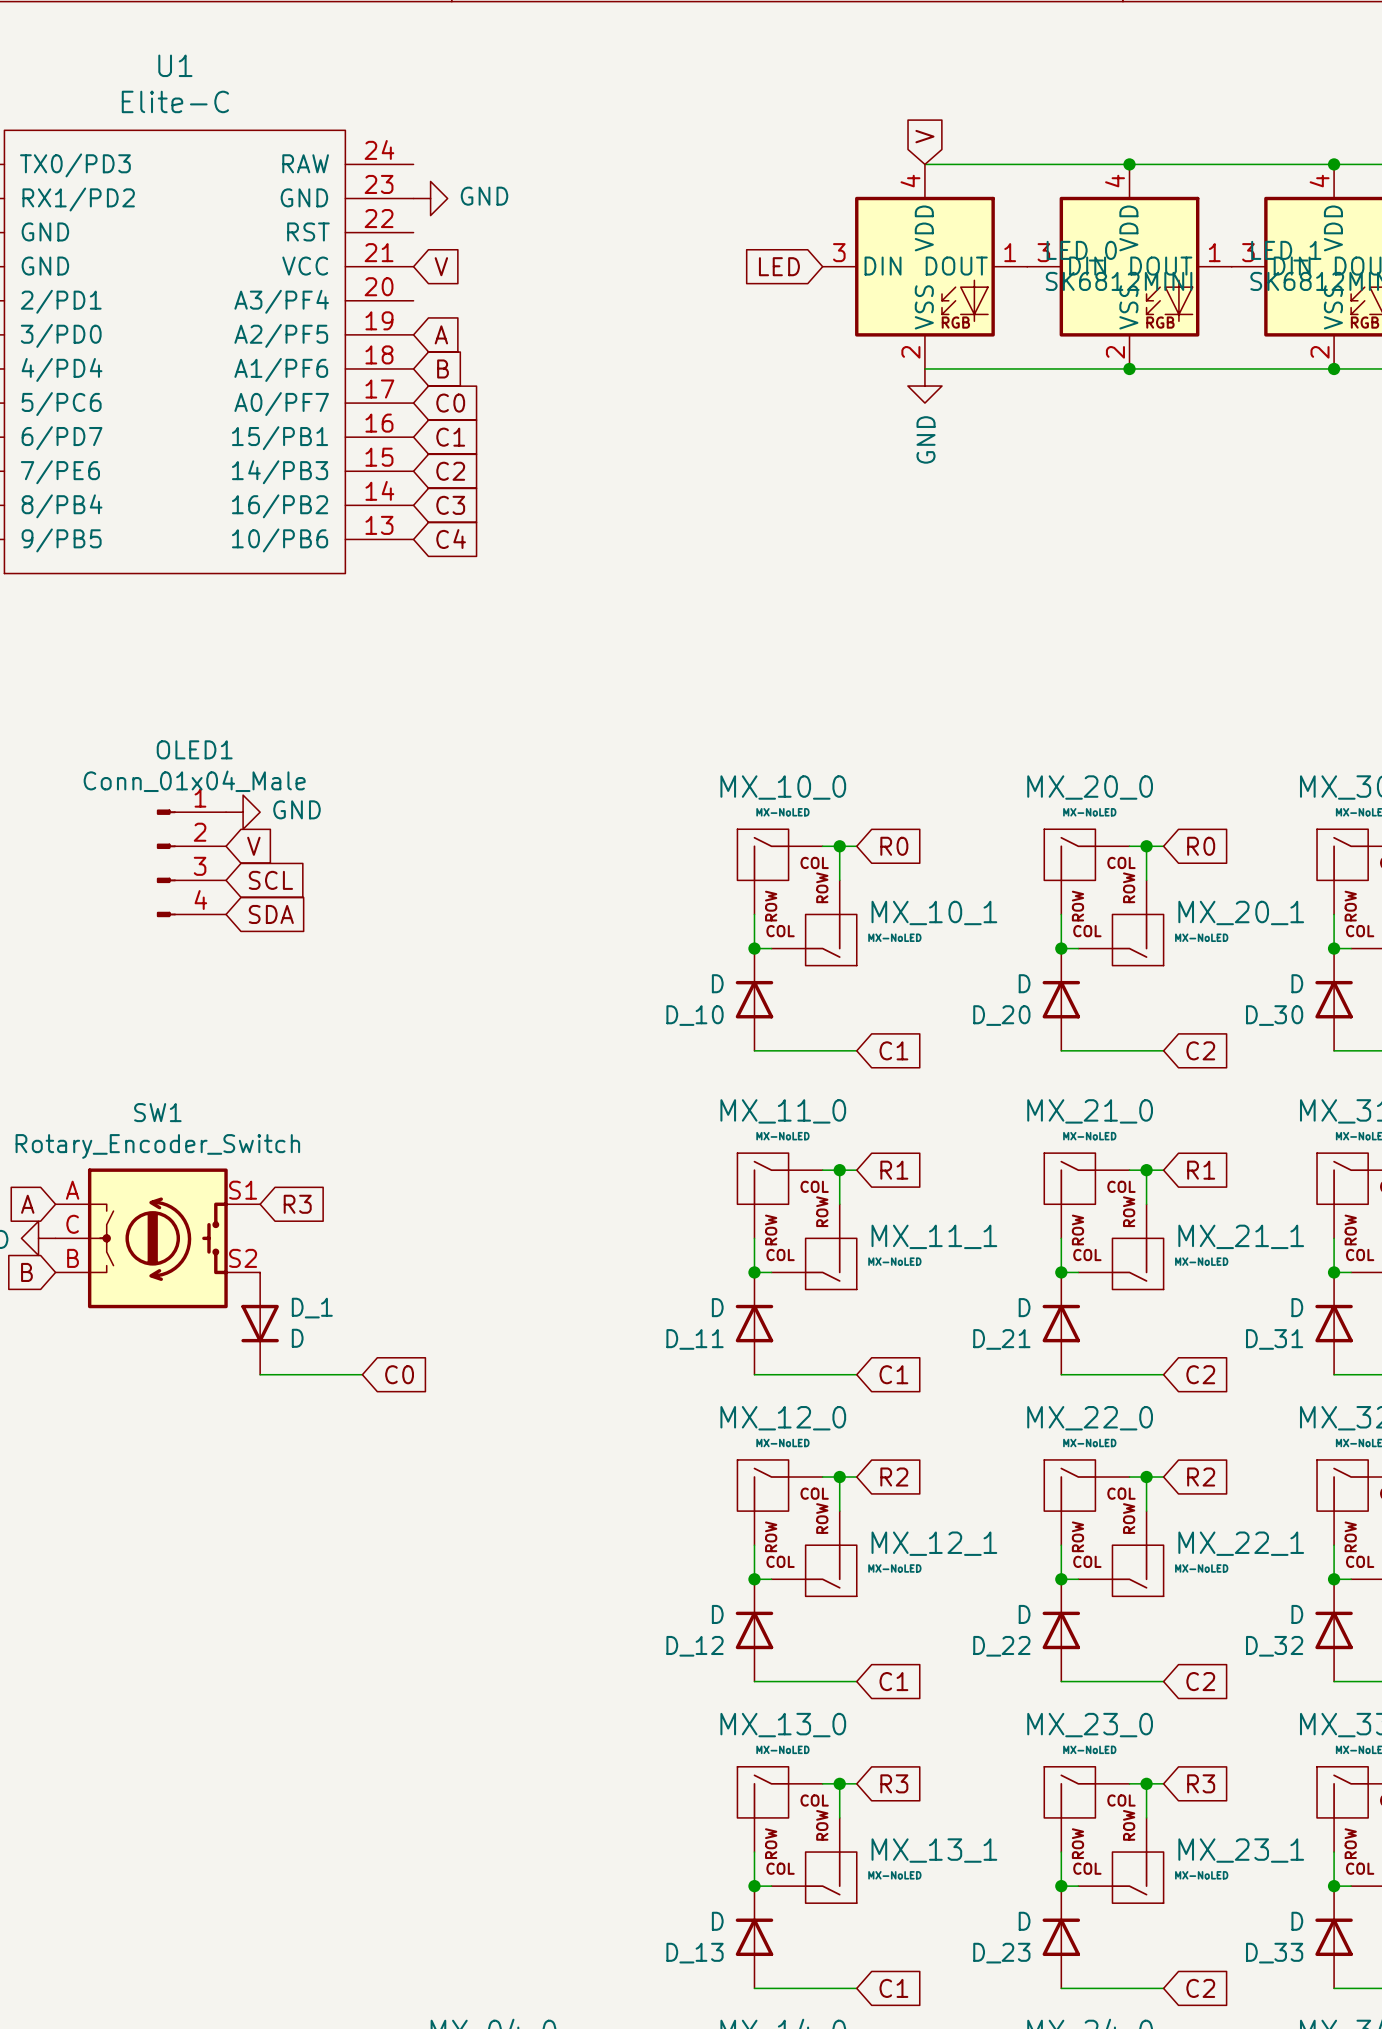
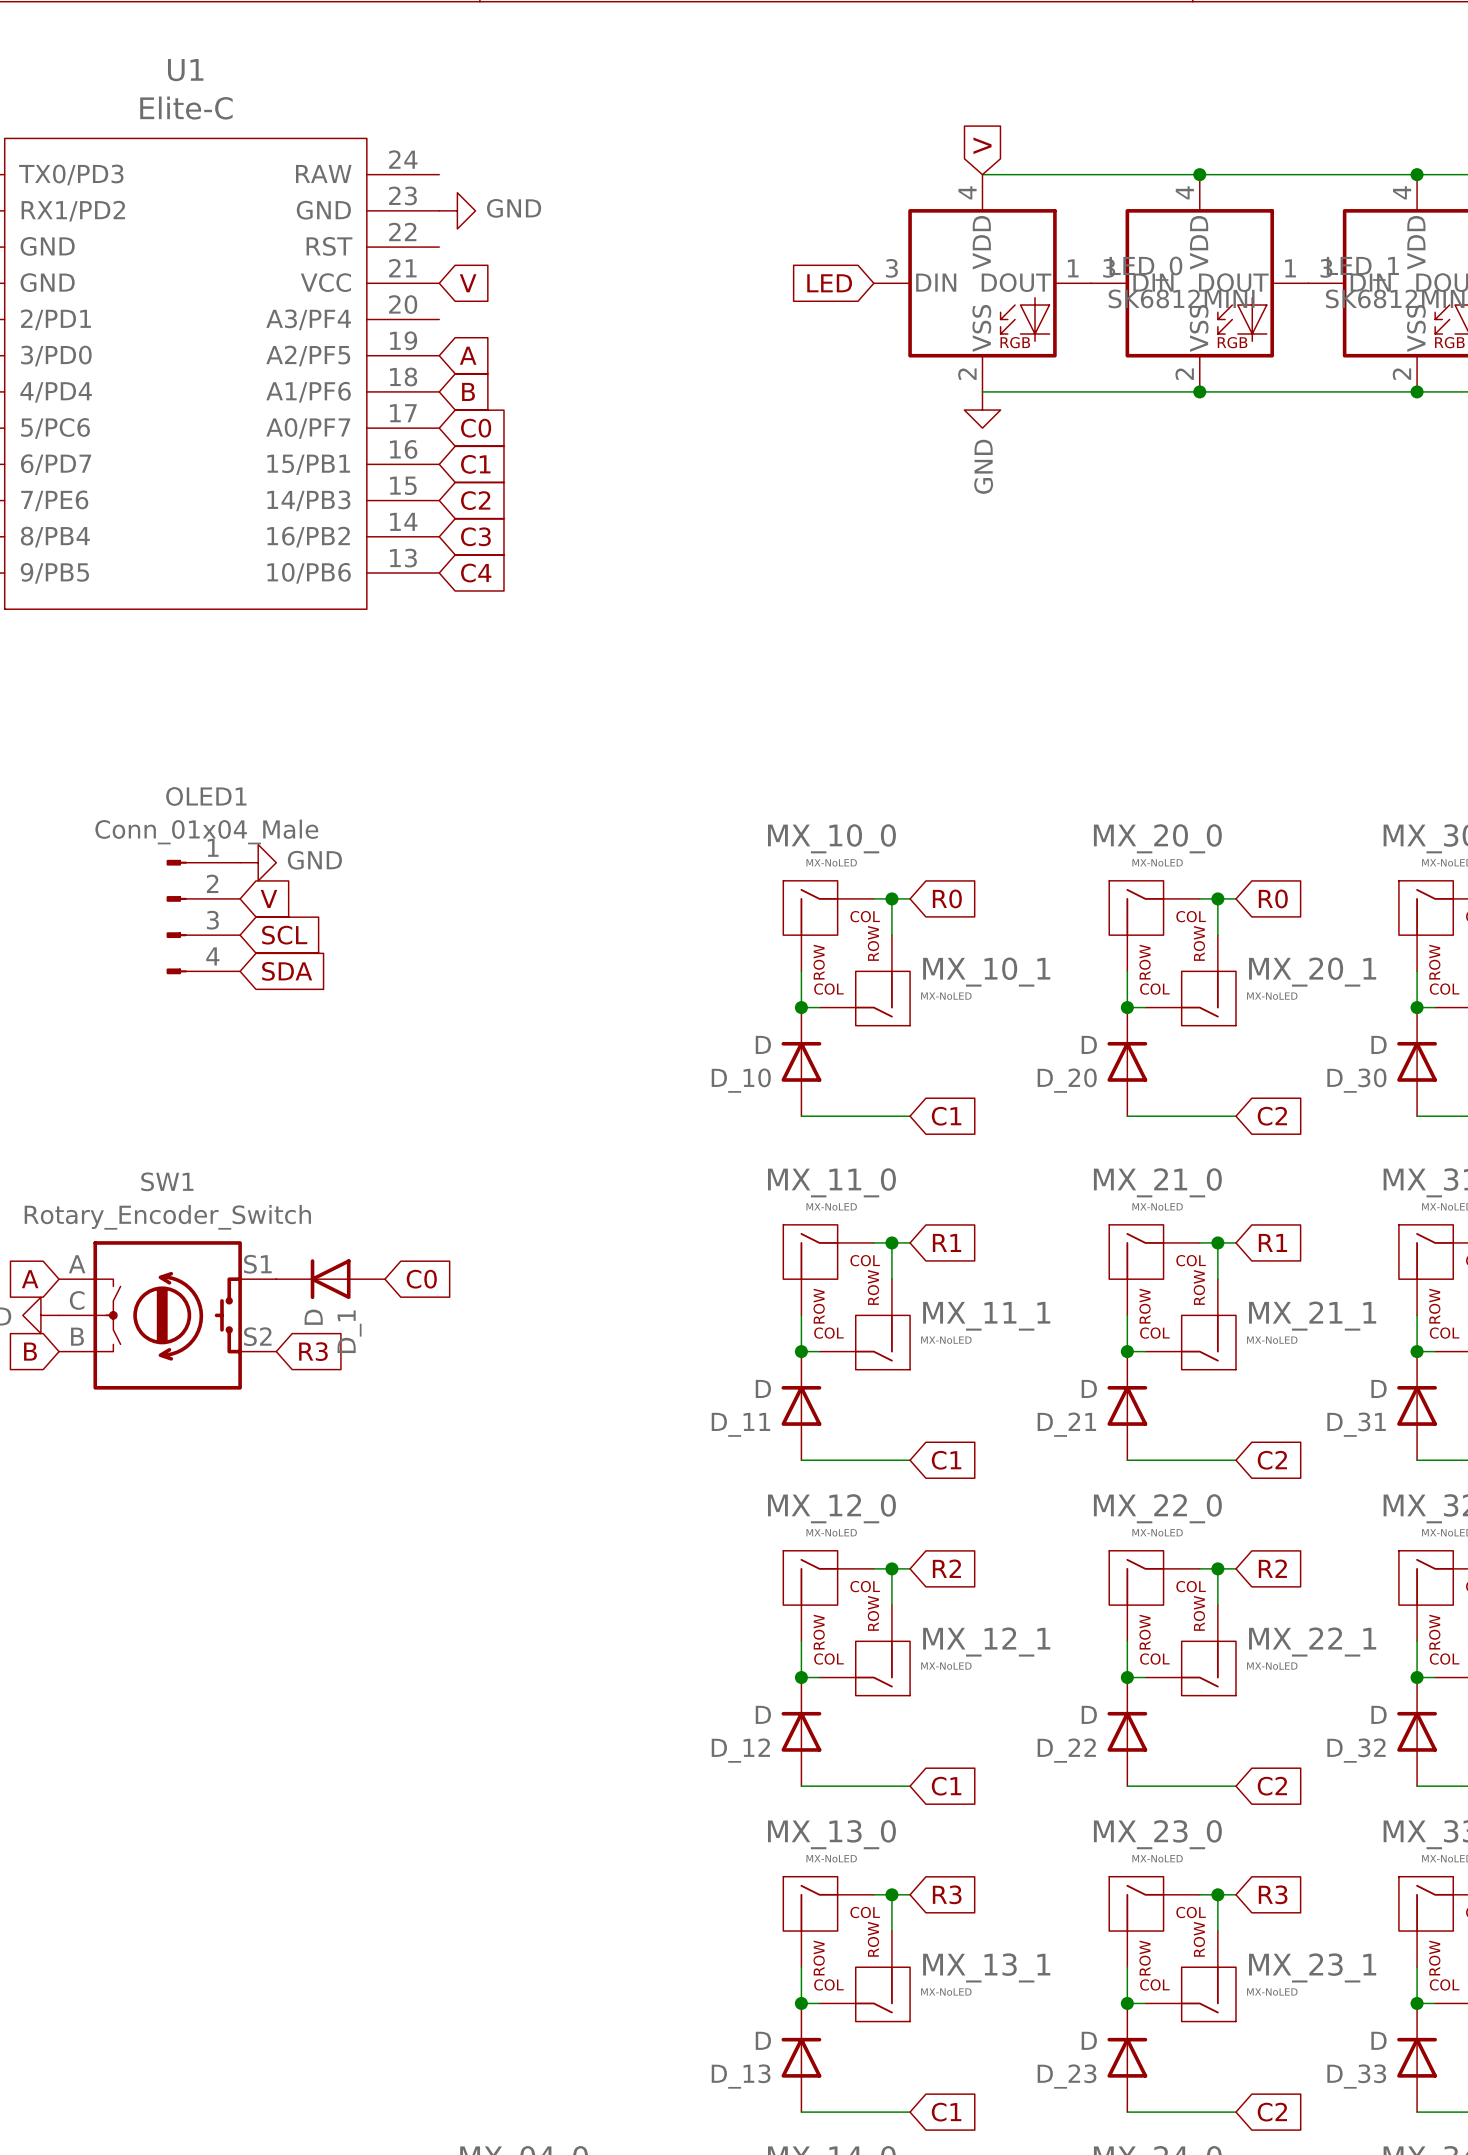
global label position: R3 (297, 1204) -> R3 (313, 1351)
D_1 rotation: 0° (260, 1323) -> 90° clockwise (330, 1279)
D_1 position: (260, 1323) -> (330, 1279)
wire: (260, 1374) (362, 1374) -> none
global label position: C0 (399, 1374) -> C0 (421, 1279)

